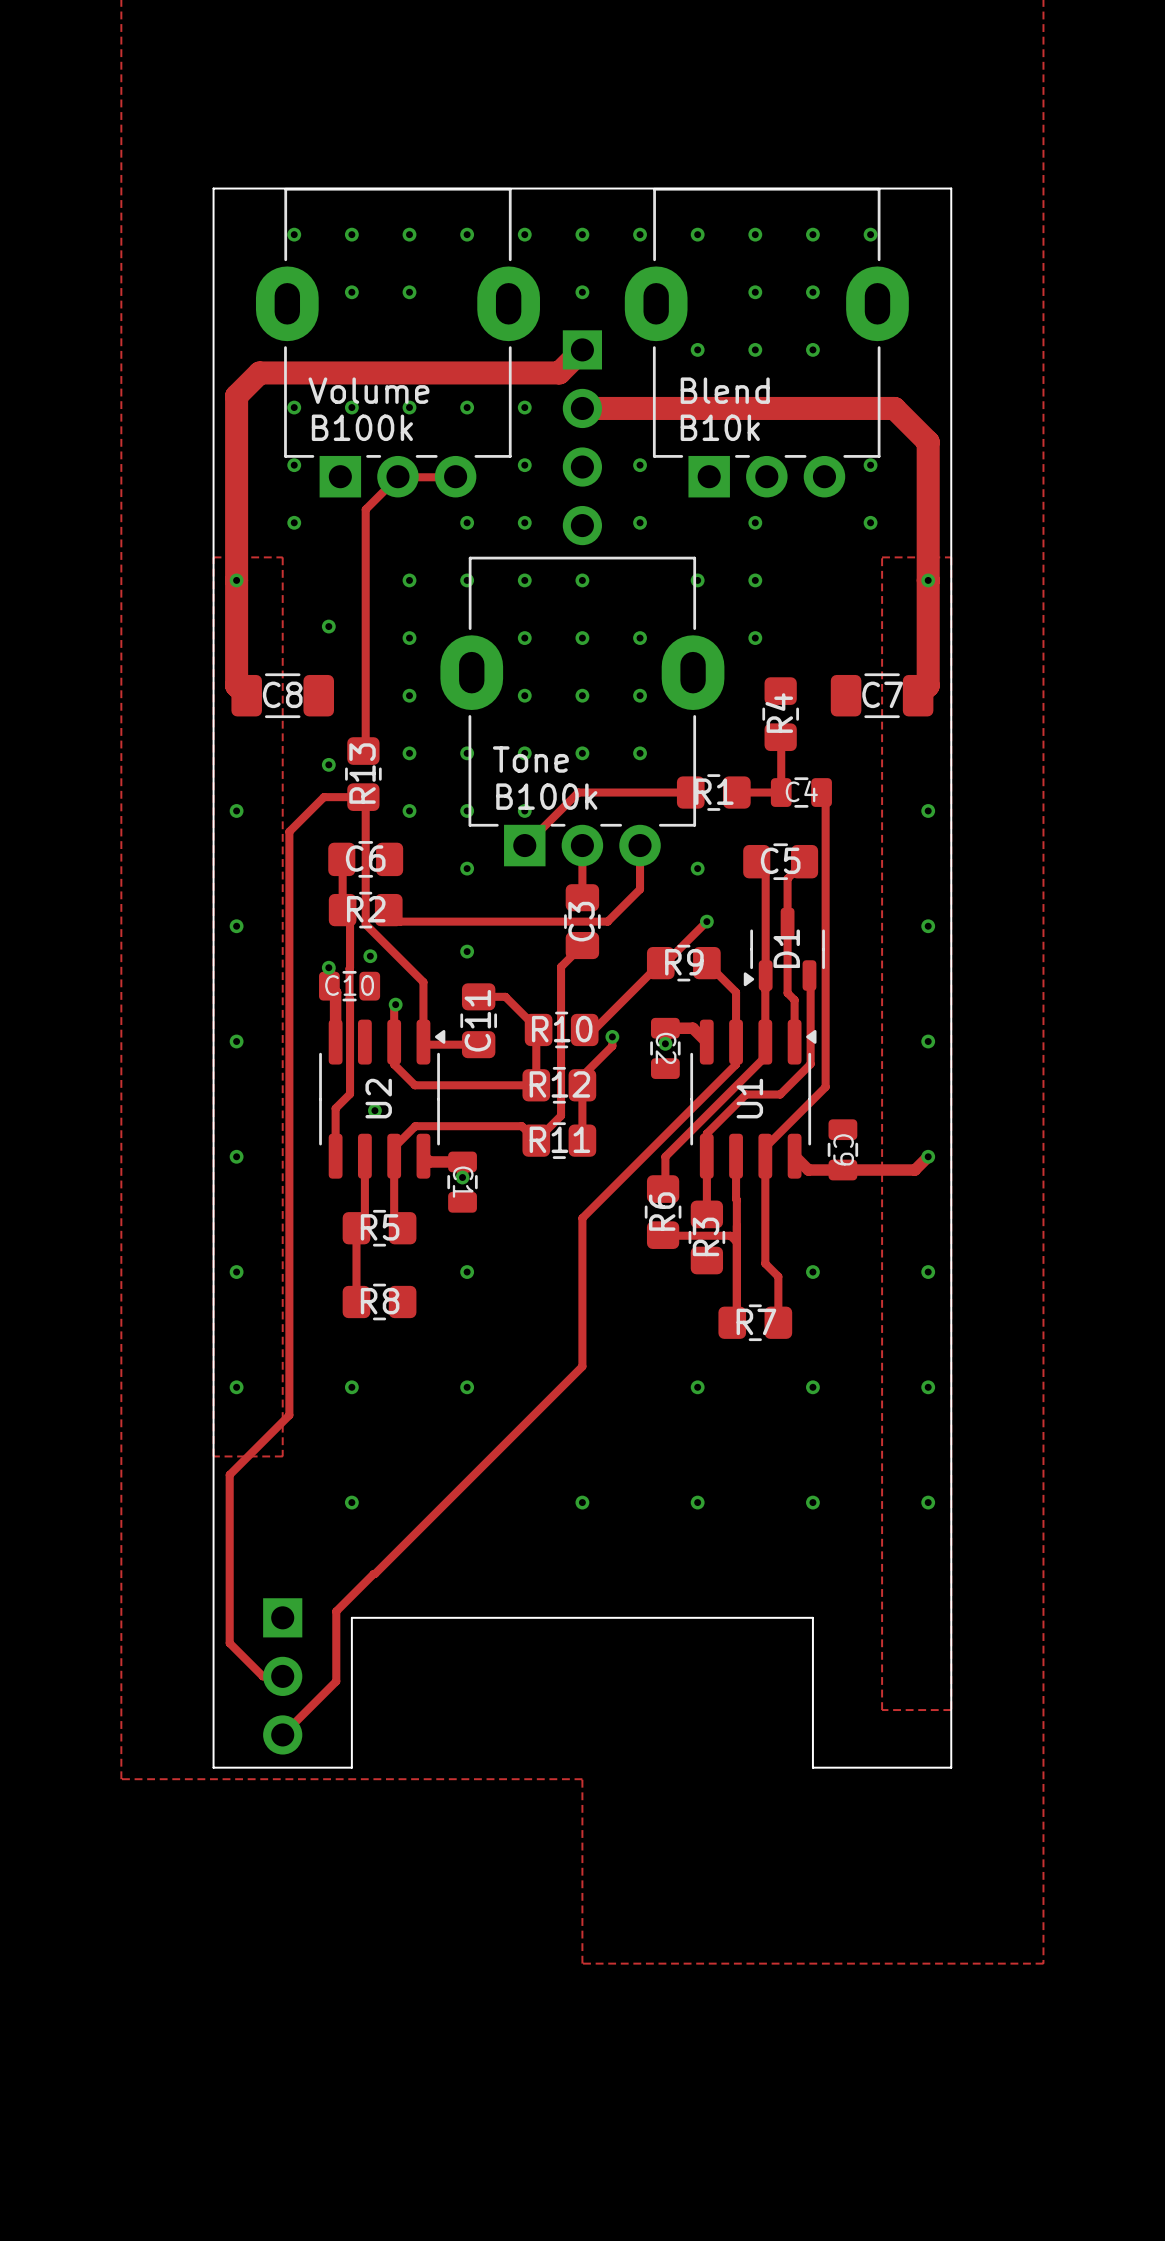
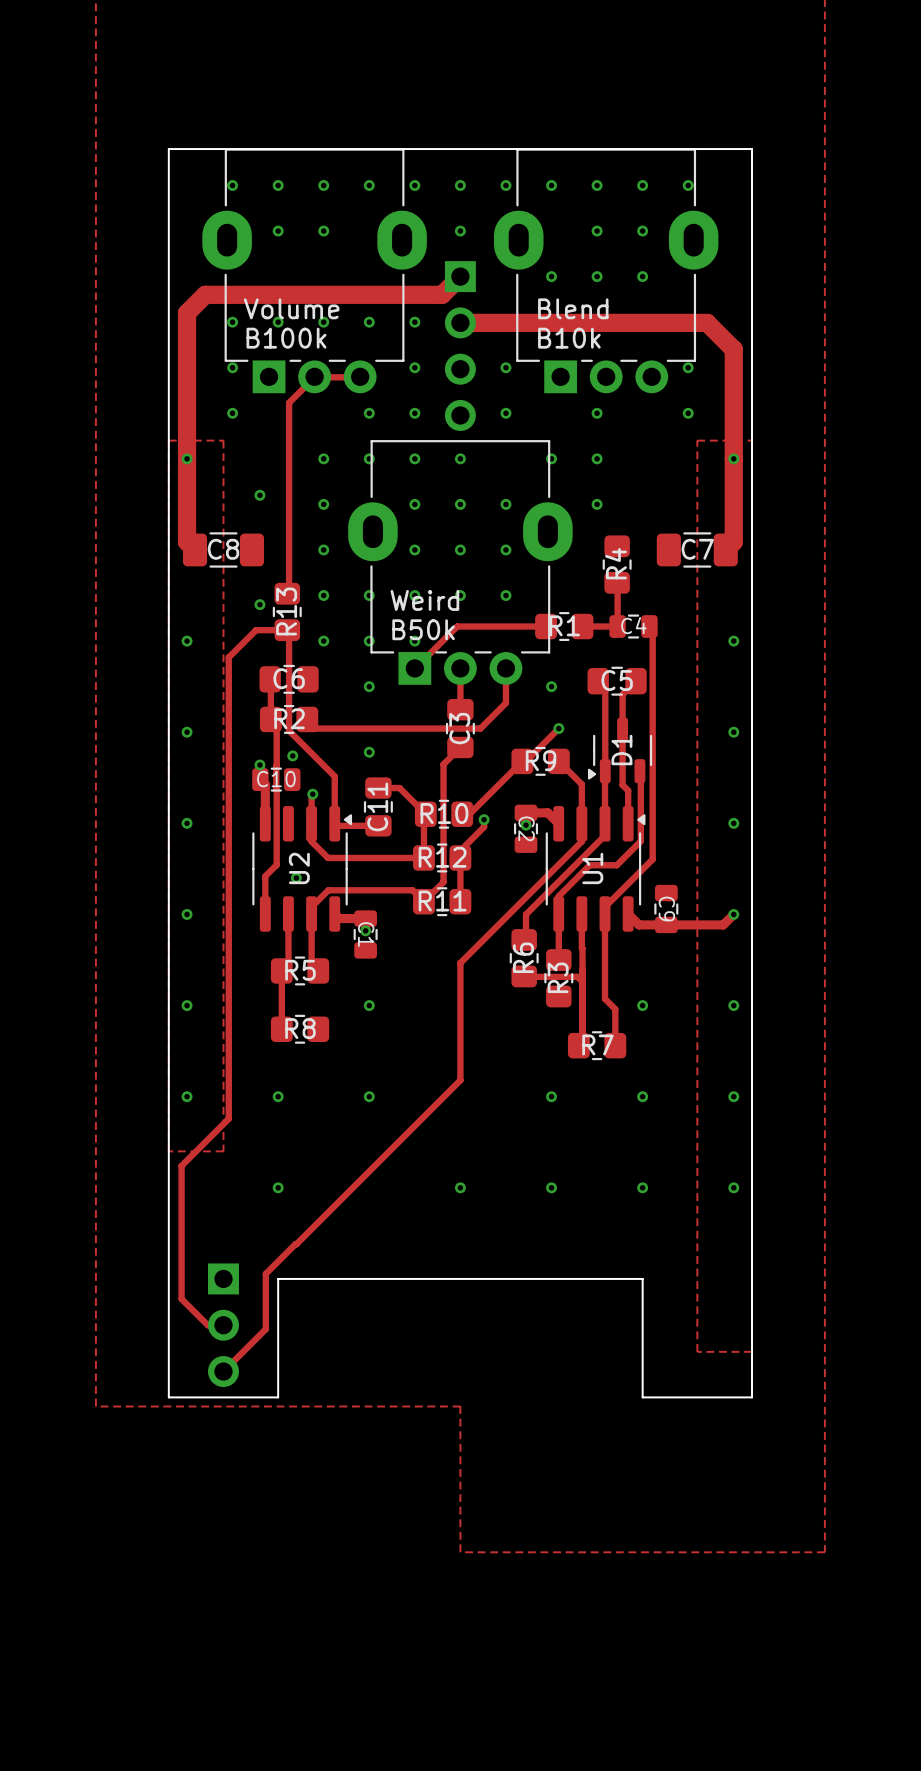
text: Tone (530, 759) -> Weird (424, 600)
text: B100k (546, 796) -> B50k (423, 629)

